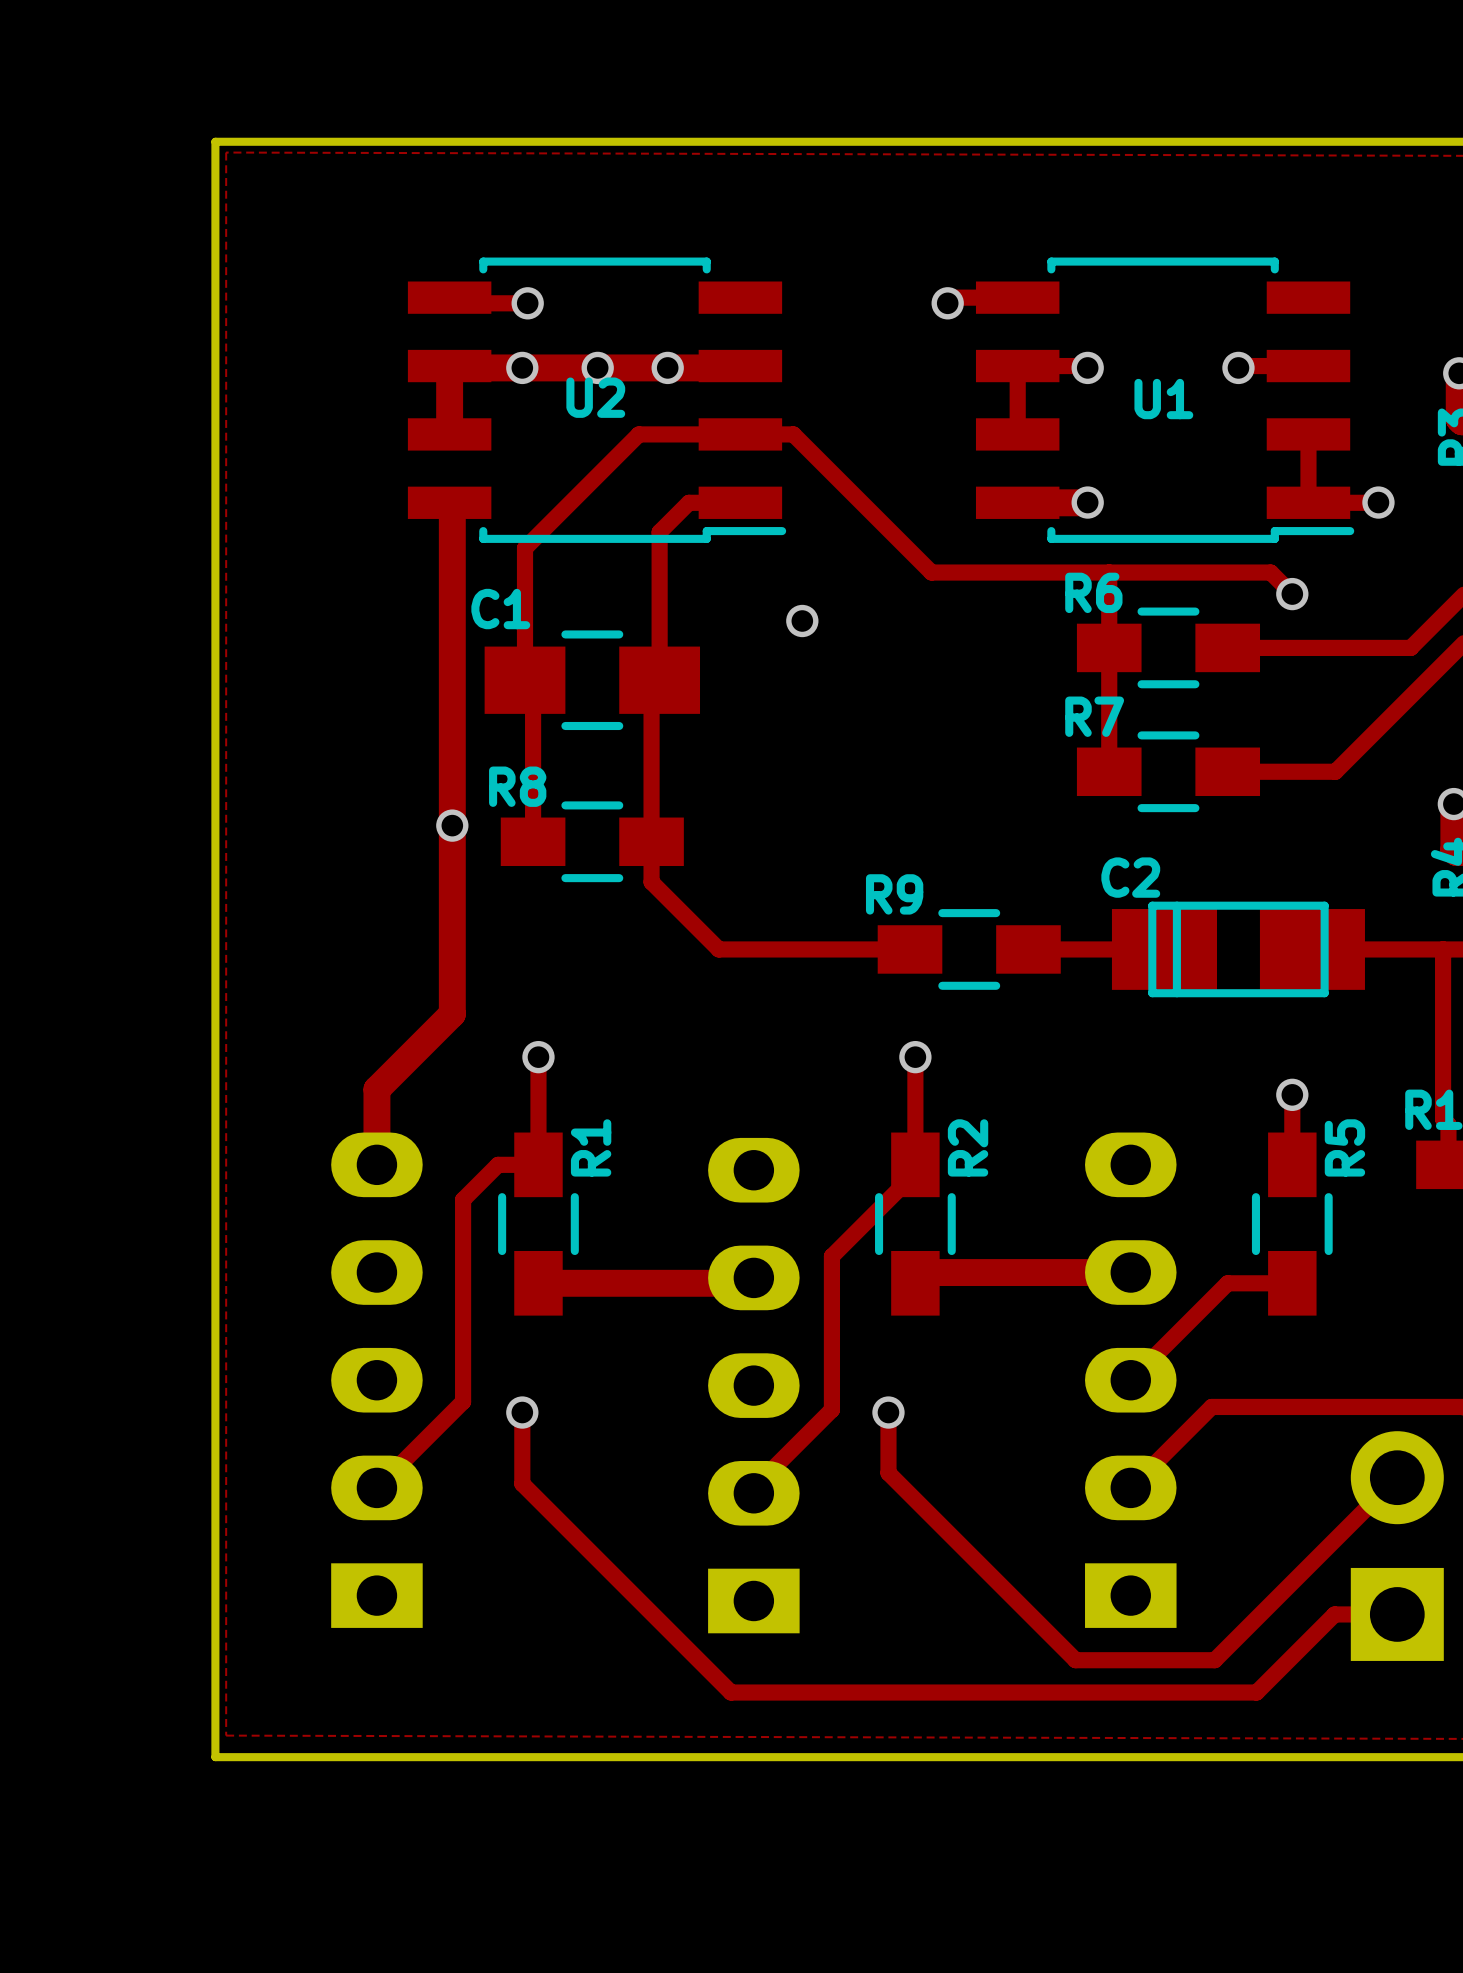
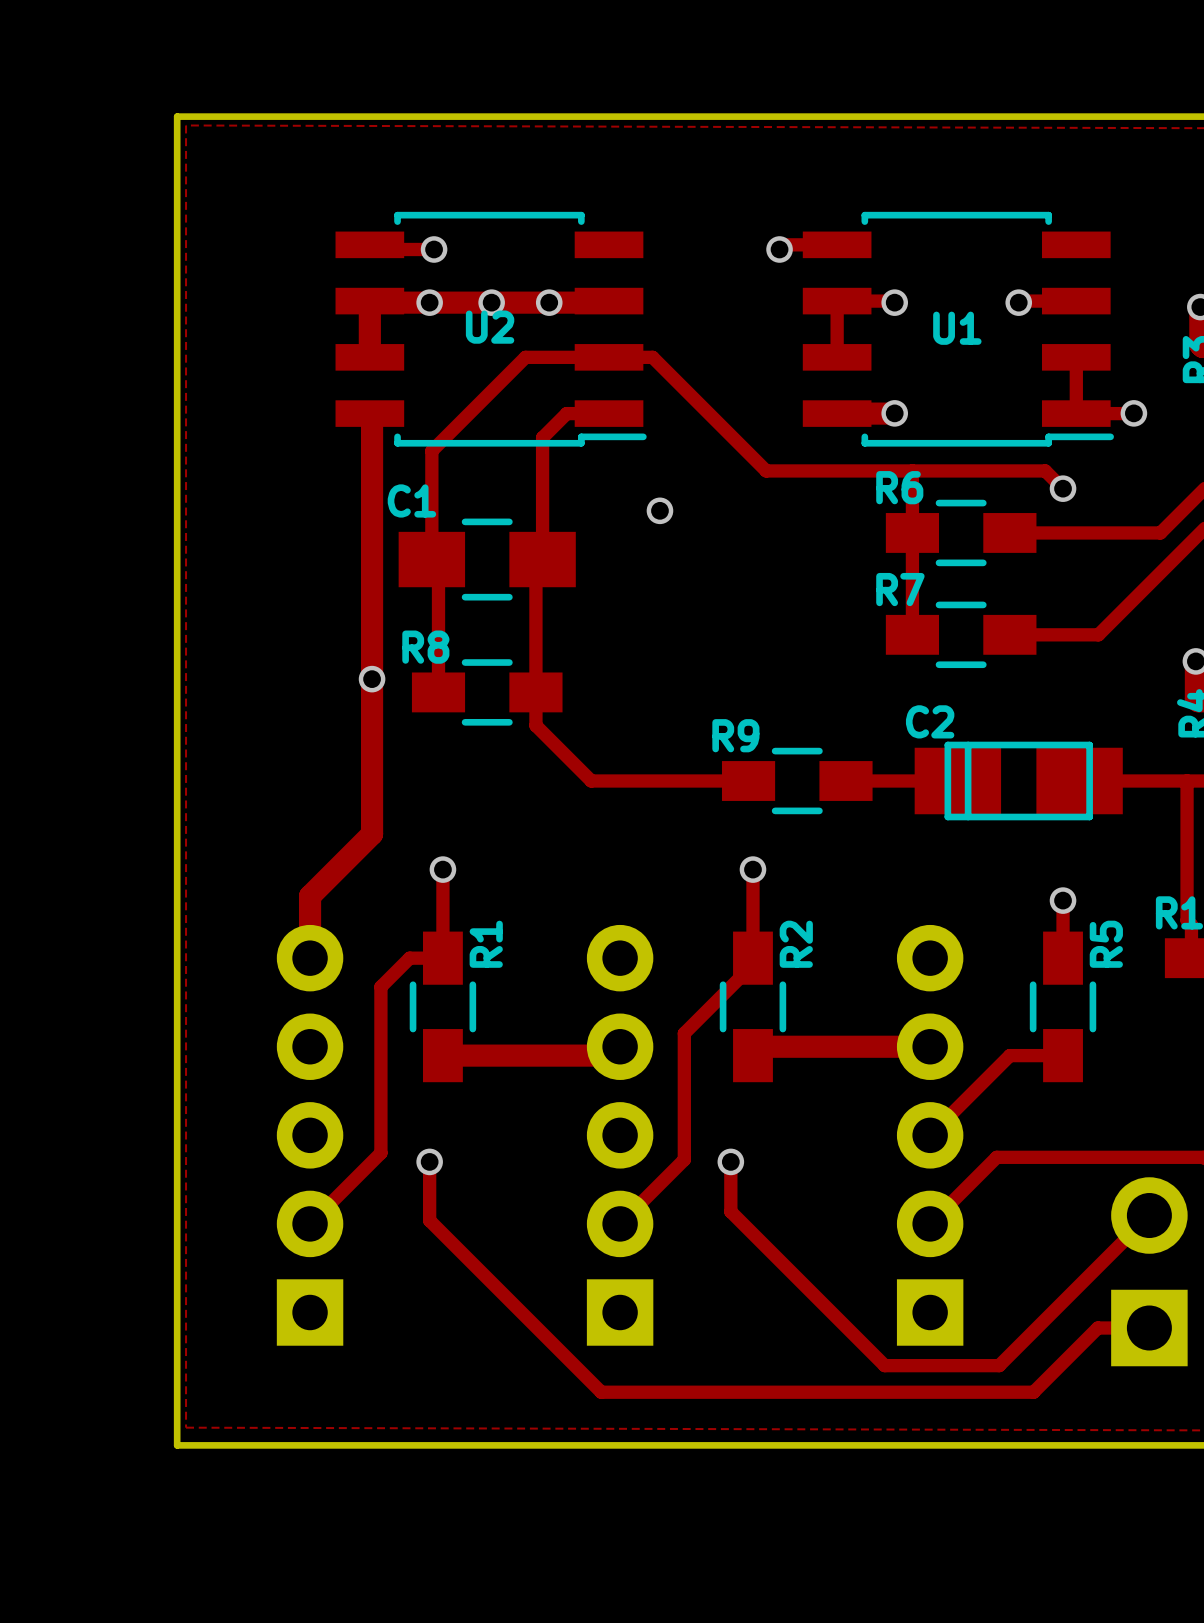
part footprint: [331, 1132, 423, 1628] -> [276, 924, 344, 1346]
part footprint: [1085, 1132, 1177, 1628] -> [896, 924, 964, 1346]
part footprint: [708, 1137, 800, 1634] -> [586, 924, 654, 1346]

